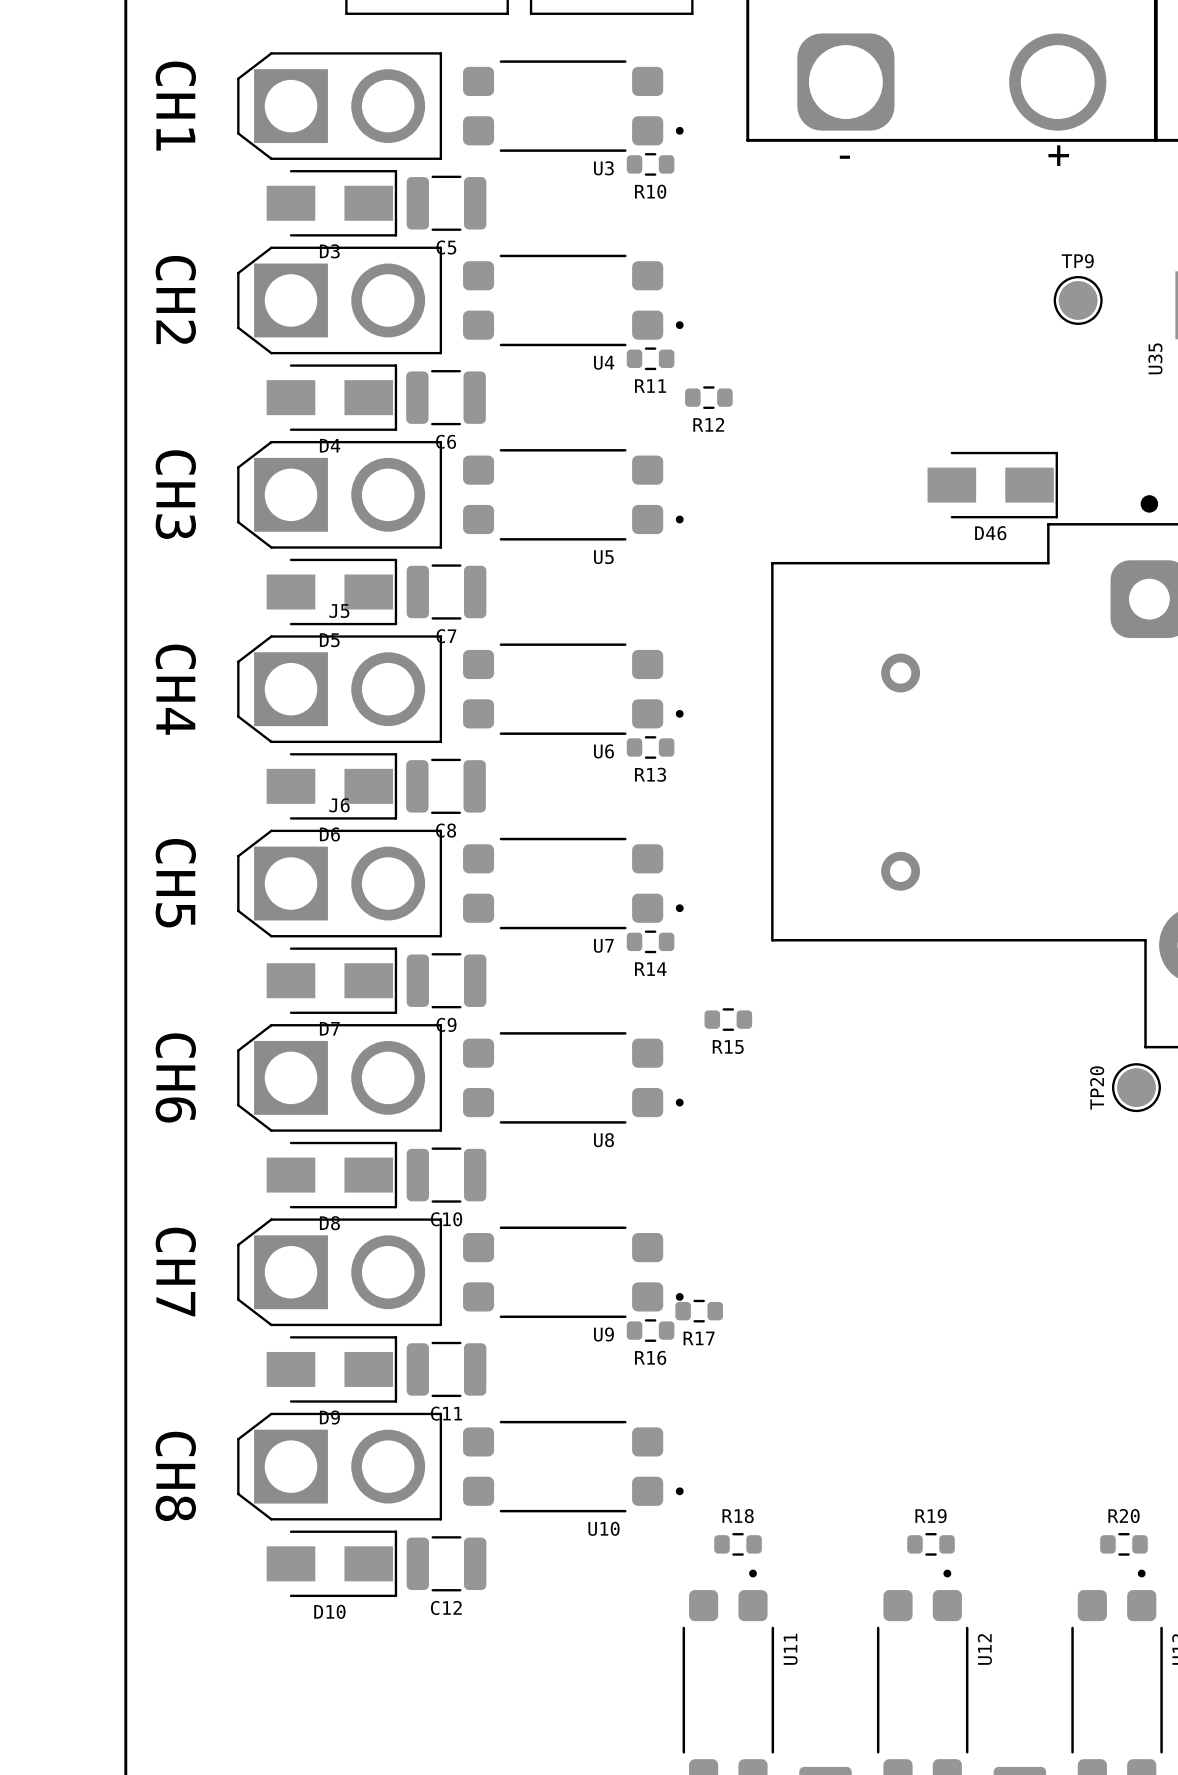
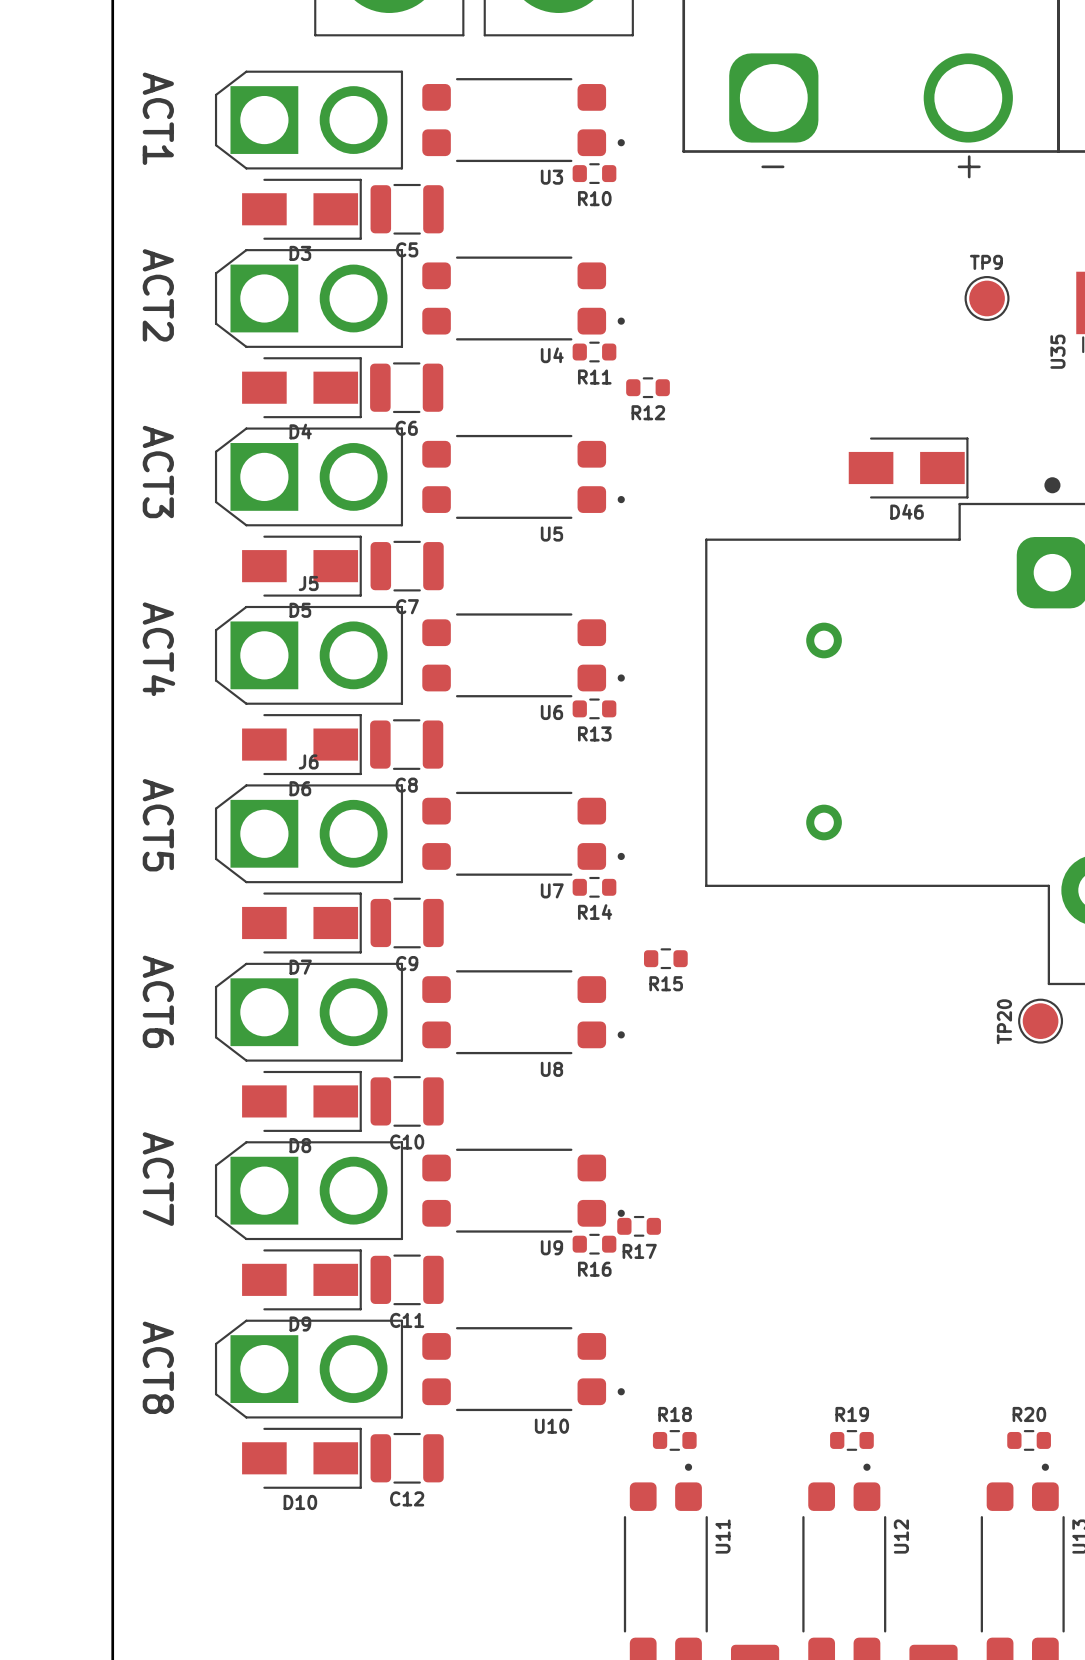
text: CH1 (175, 106) -> ACT1 (158, 118)
text: CH2 (175, 300) -> ACT2 (158, 295)
text: CH3 (175, 494) -> ACT3 (158, 472)
text: CH4 (175, 689) -> ACT4 (158, 649)
text: CH5 (175, 883) -> ACT5 (158, 825)
text: CH6 (175, 1077) -> ACT6 (158, 1001)
text: CH7 (175, 1272) -> ACT7 (158, 1179)
text: CH8 (175, 1476) -> ACT8 (158, 1367)

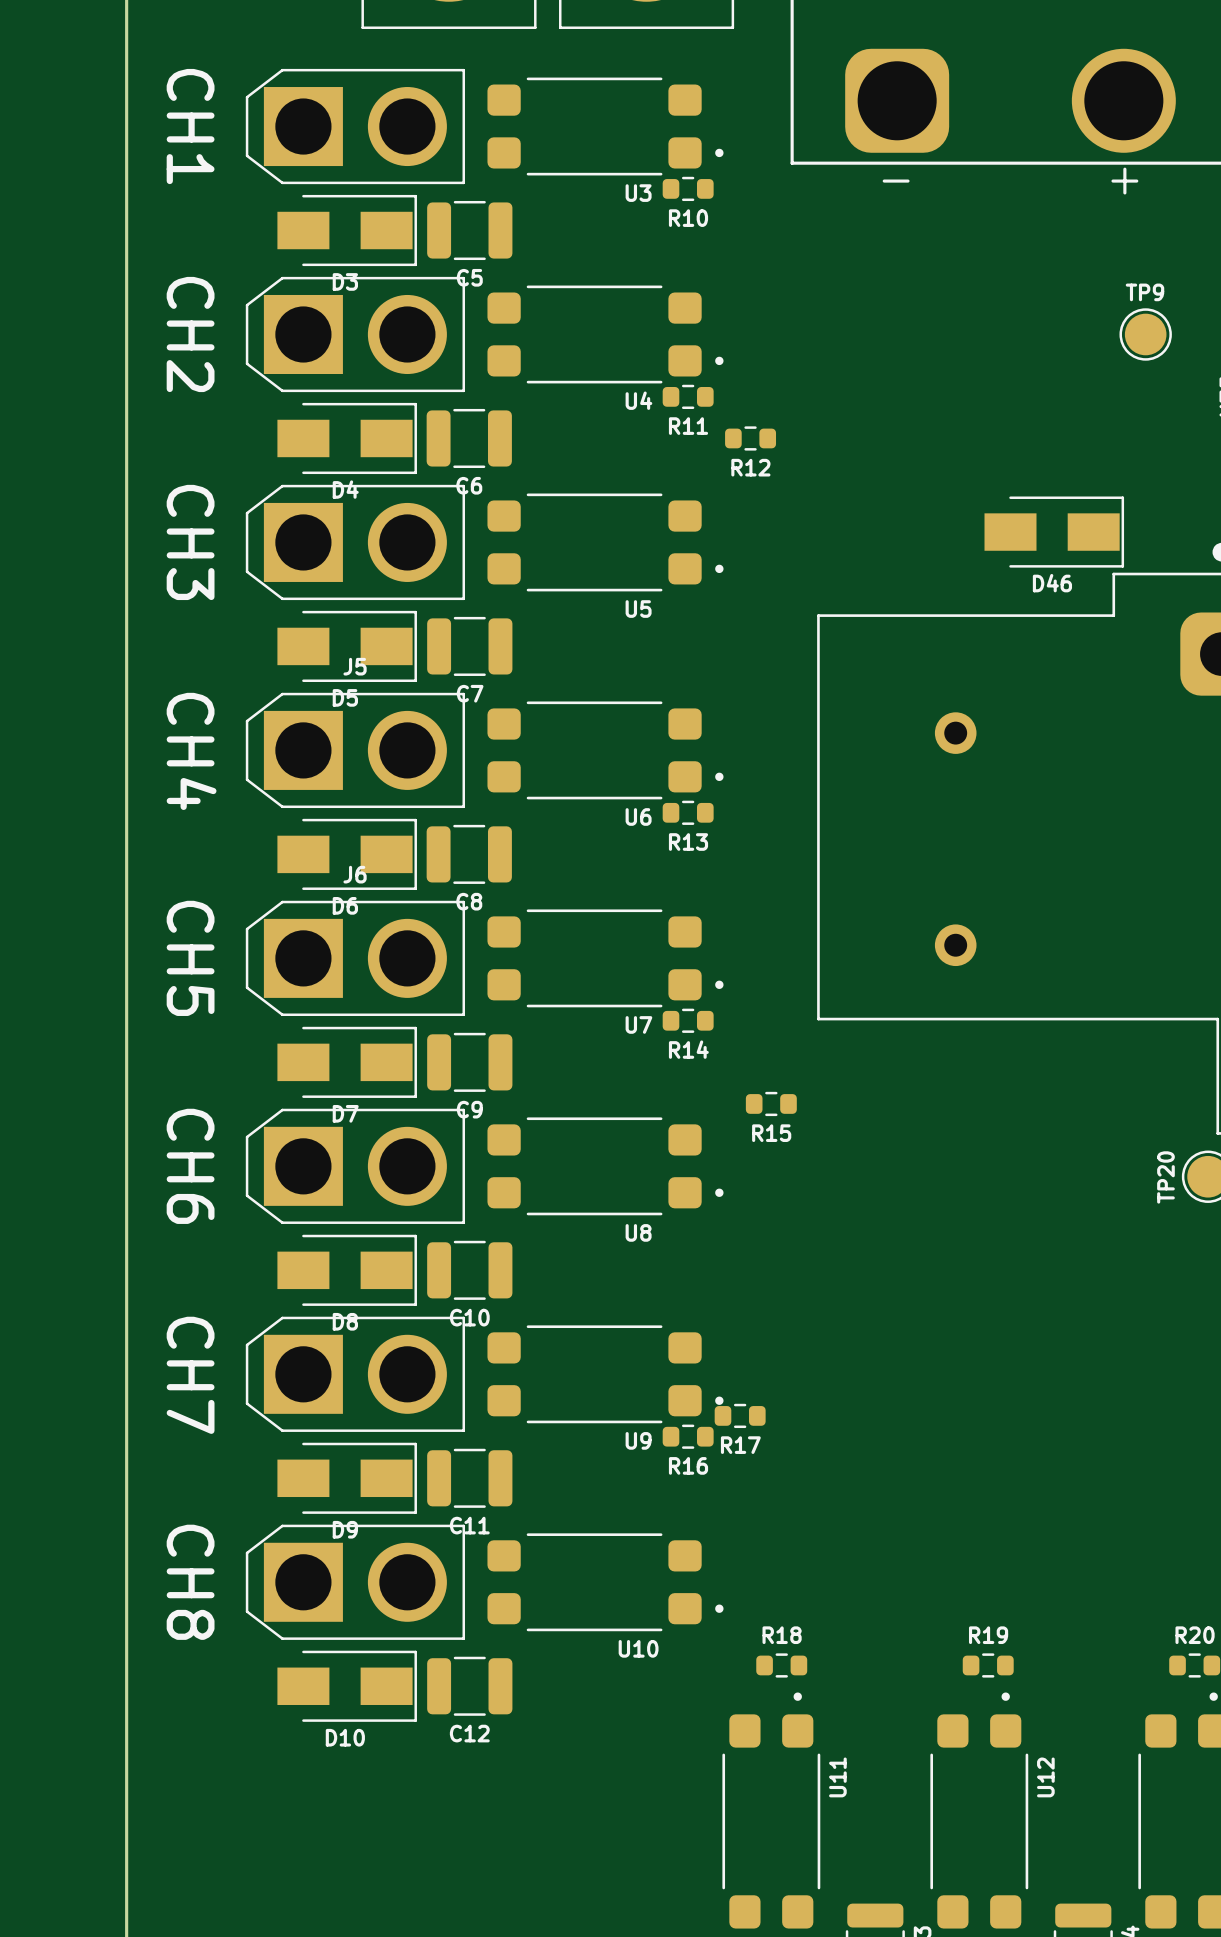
text: ACT1 (158, 118) -> CH1 (190, 126)
text: ACT2 (158, 295) -> CH2 (190, 334)
text: ACT3 (158, 472) -> CH3 (190, 542)
text: ACT4 (158, 649) -> CH4 (191, 751)
text: ACT5 (158, 825) -> CH5 (190, 958)
text: ACT6 (158, 1001) -> CH6 (190, 1166)
text: ACT7 (158, 1179) -> CH7 (190, 1375)
text: ACT8 (158, 1367) -> CH8 (190, 1582)

